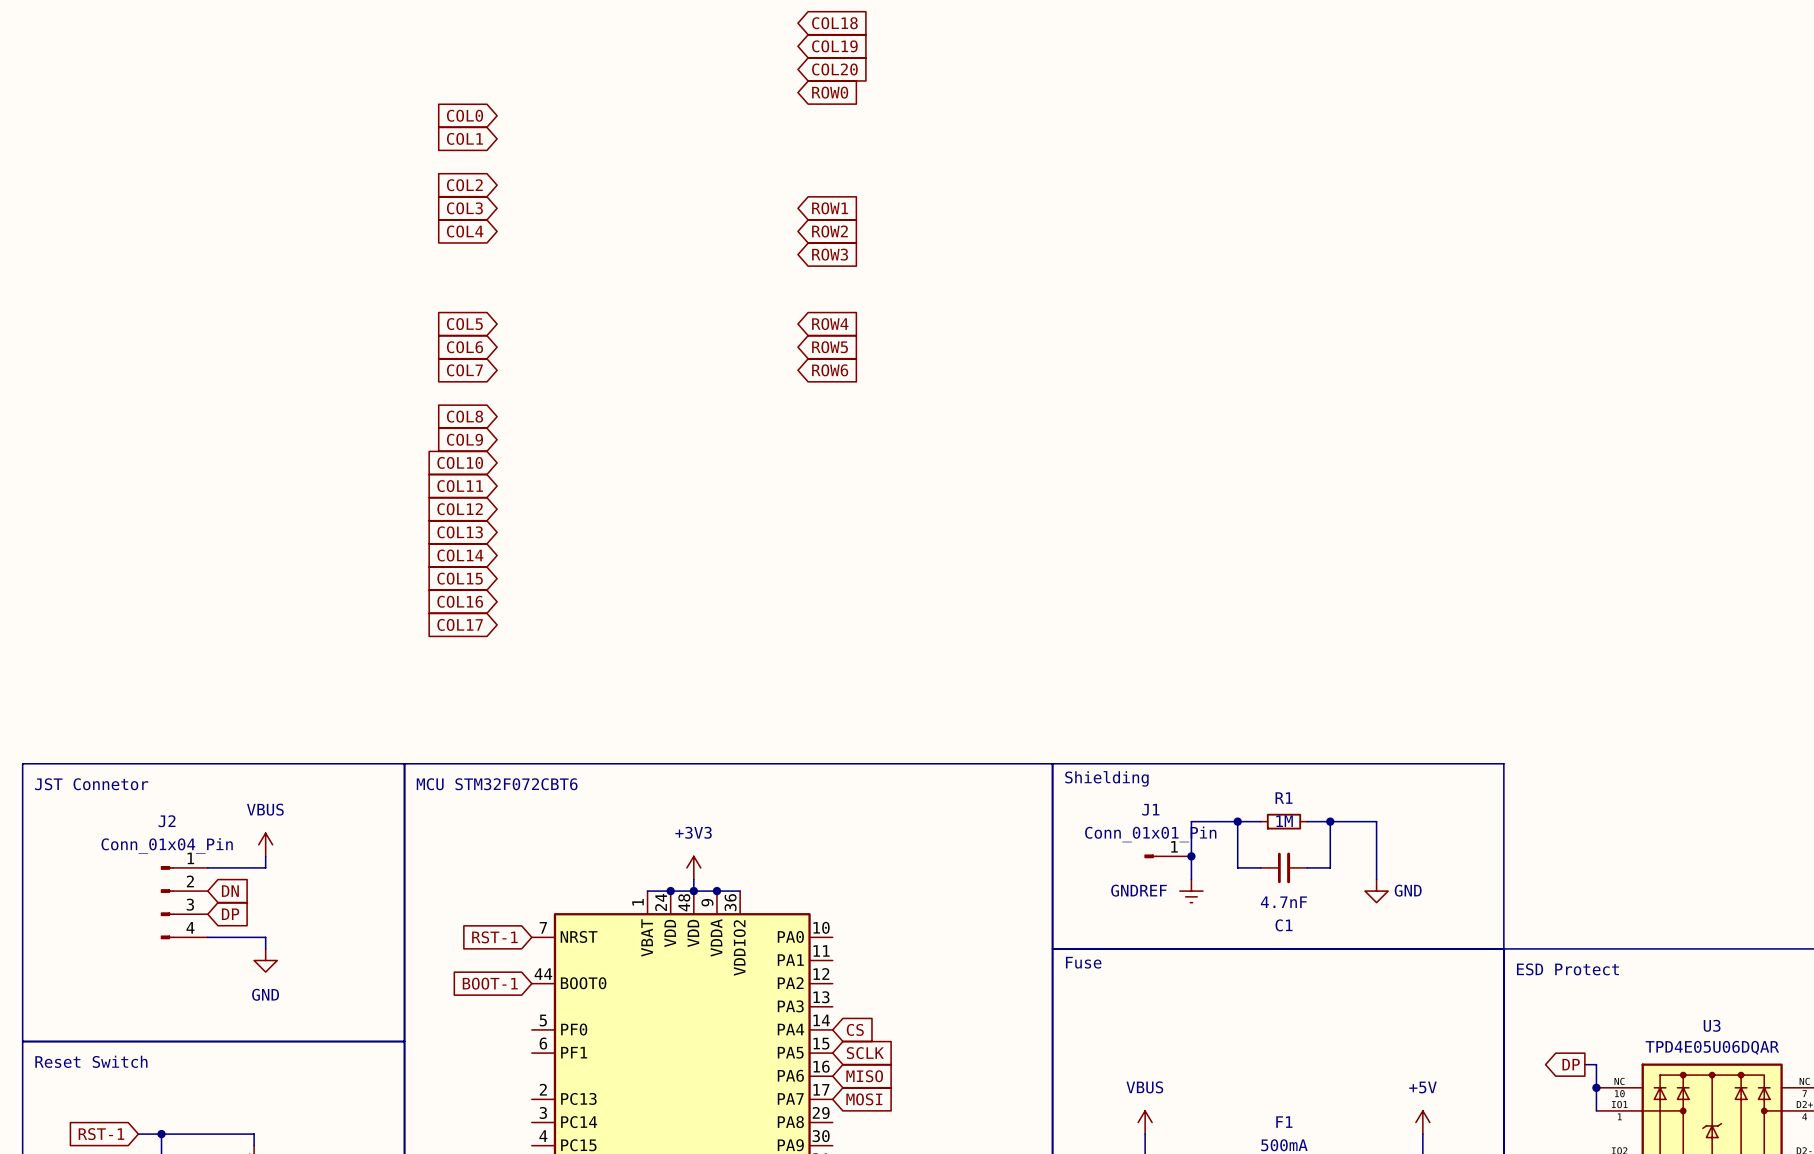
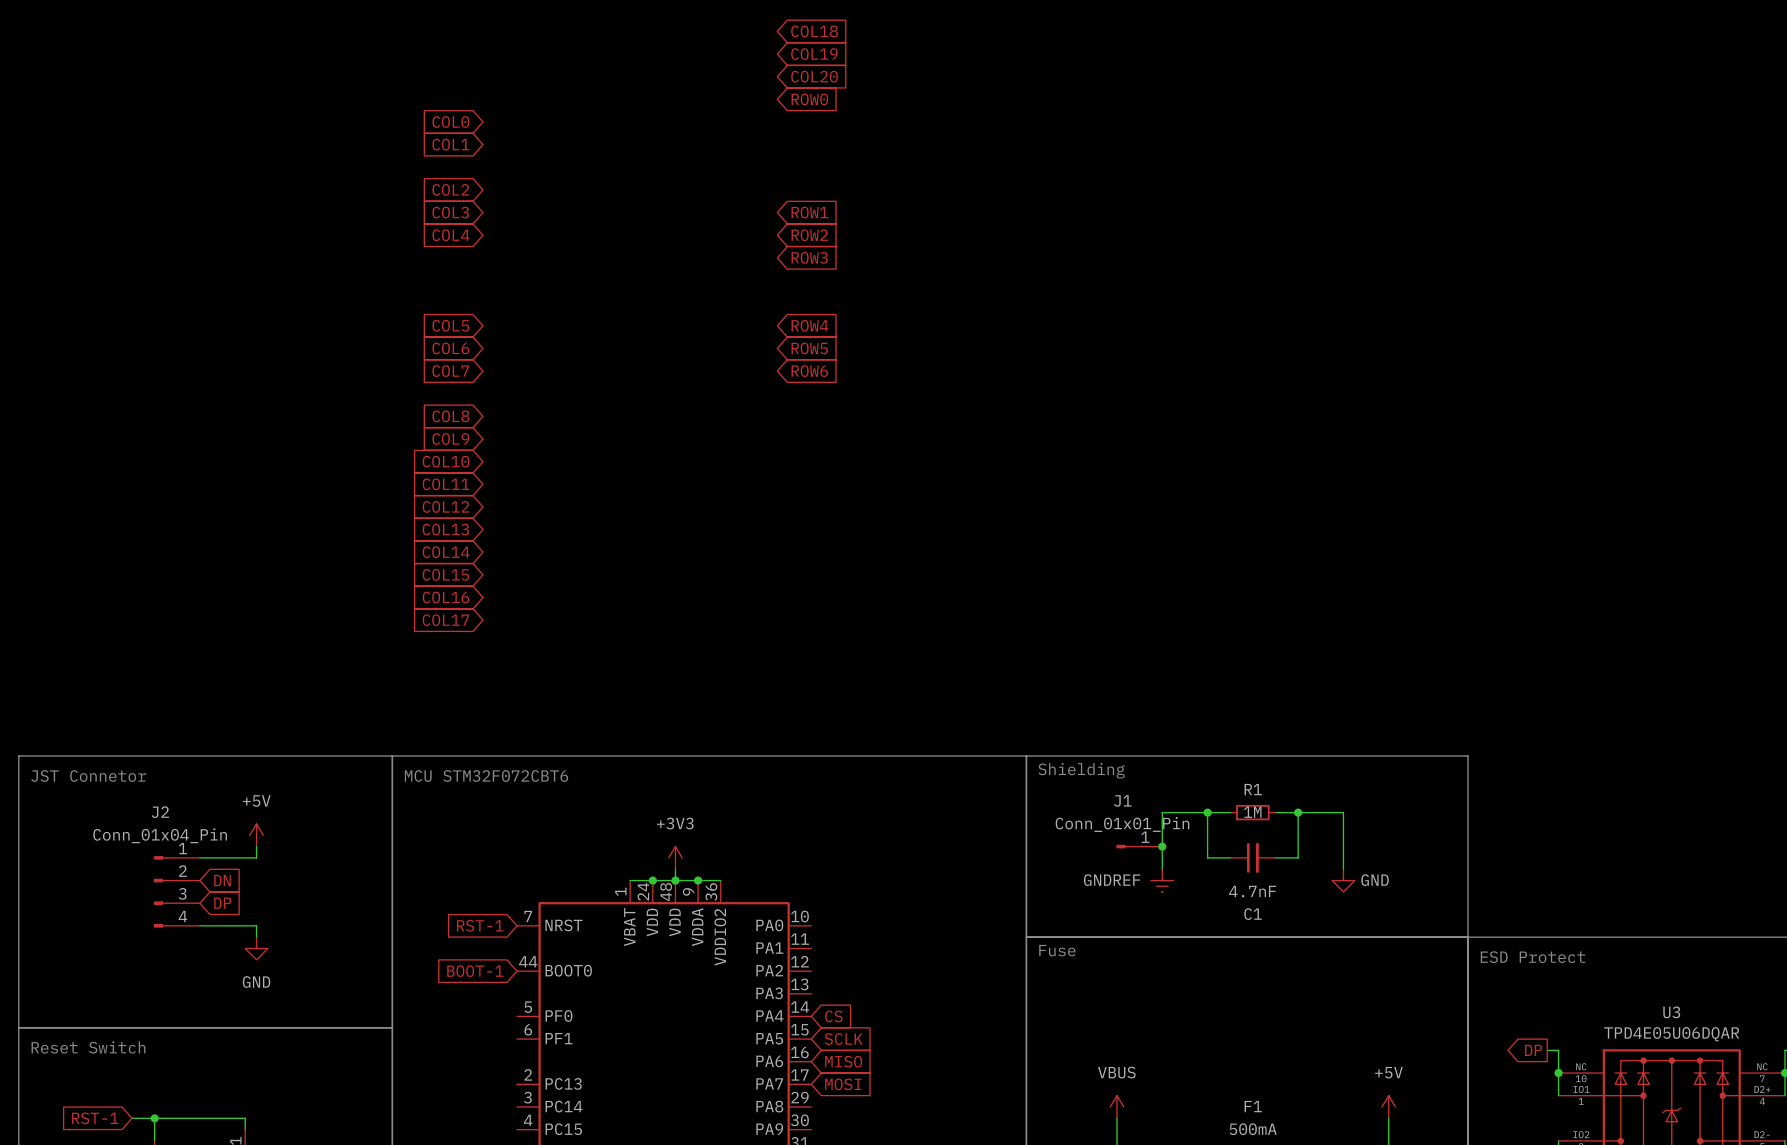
power symbol: VBUS (265, 844) -> +5V (256, 835)

